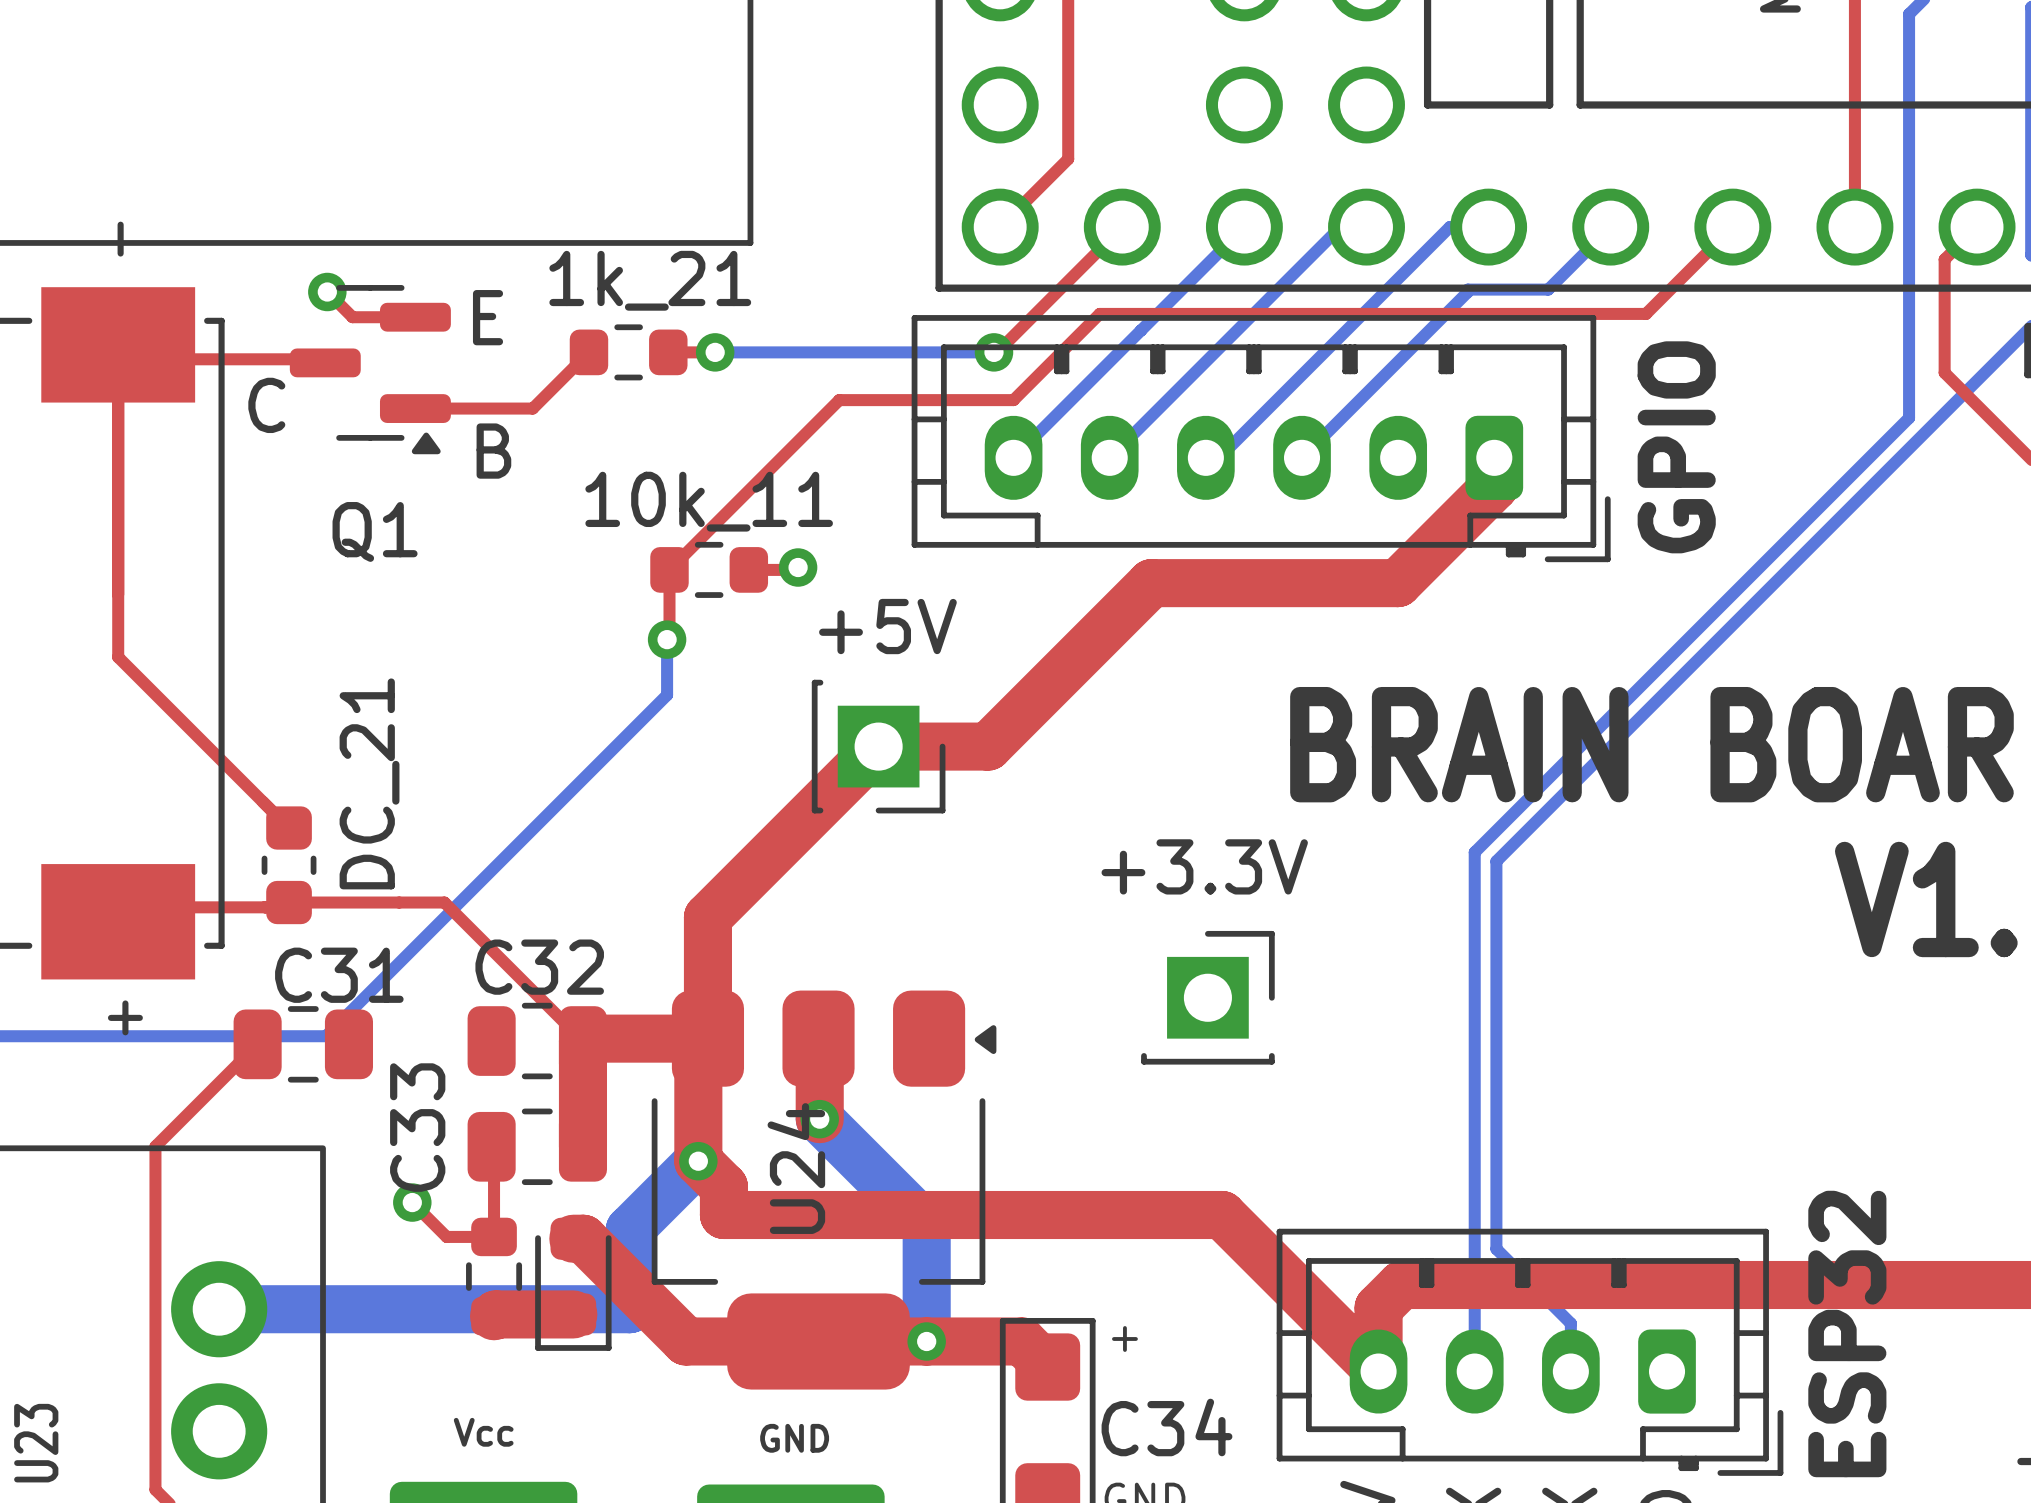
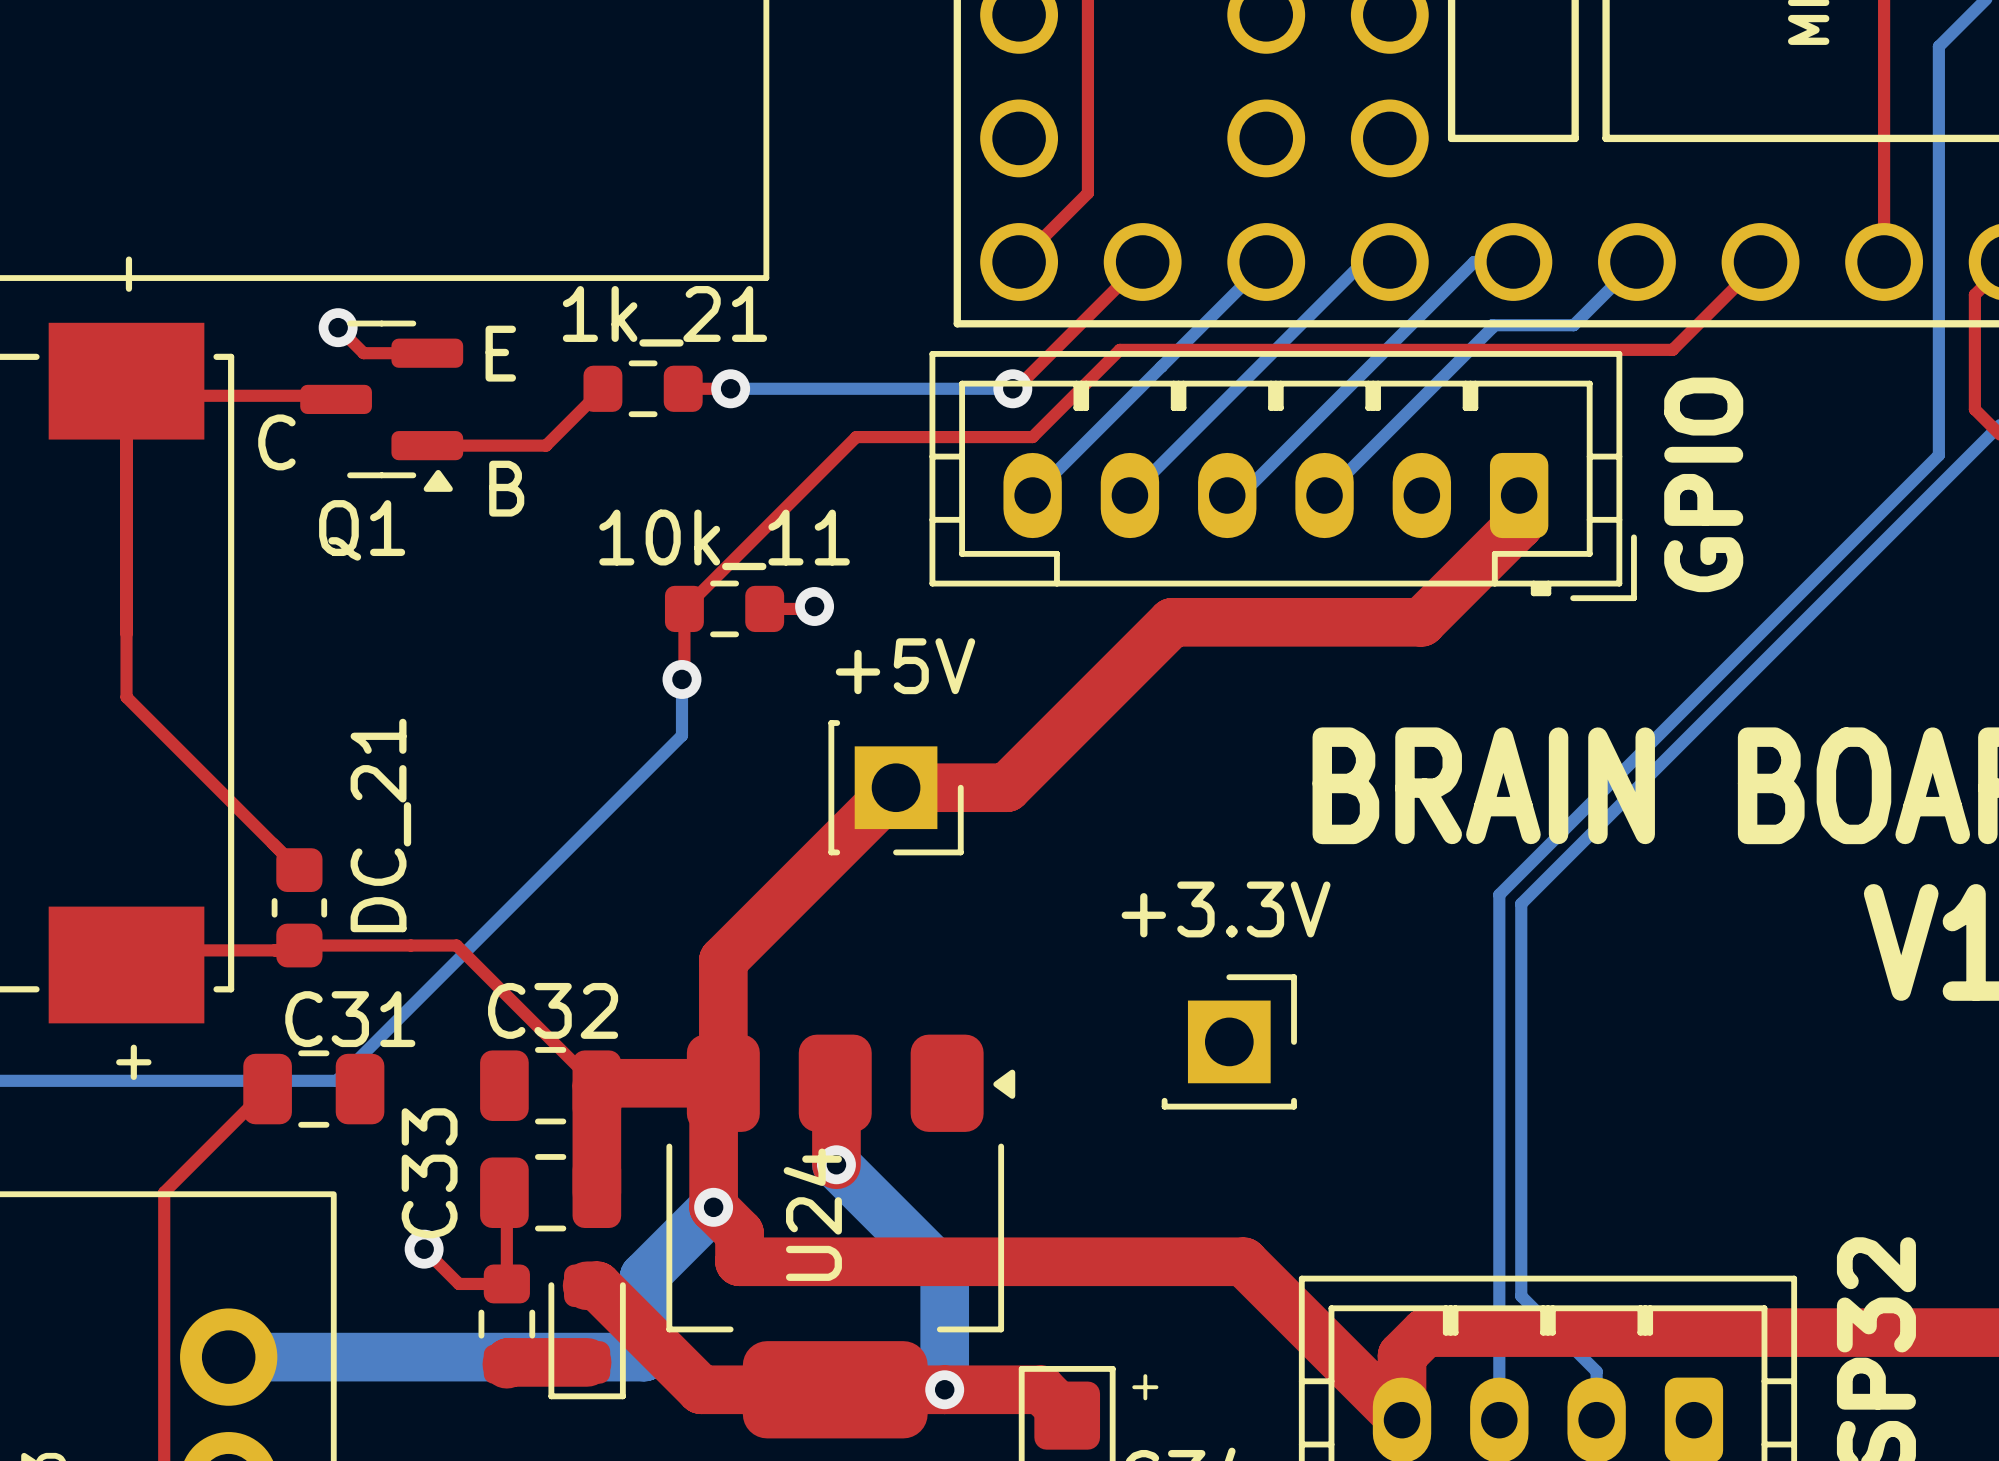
Q1 name position: Q1 (375, 531) -> Q1 (362, 530)

